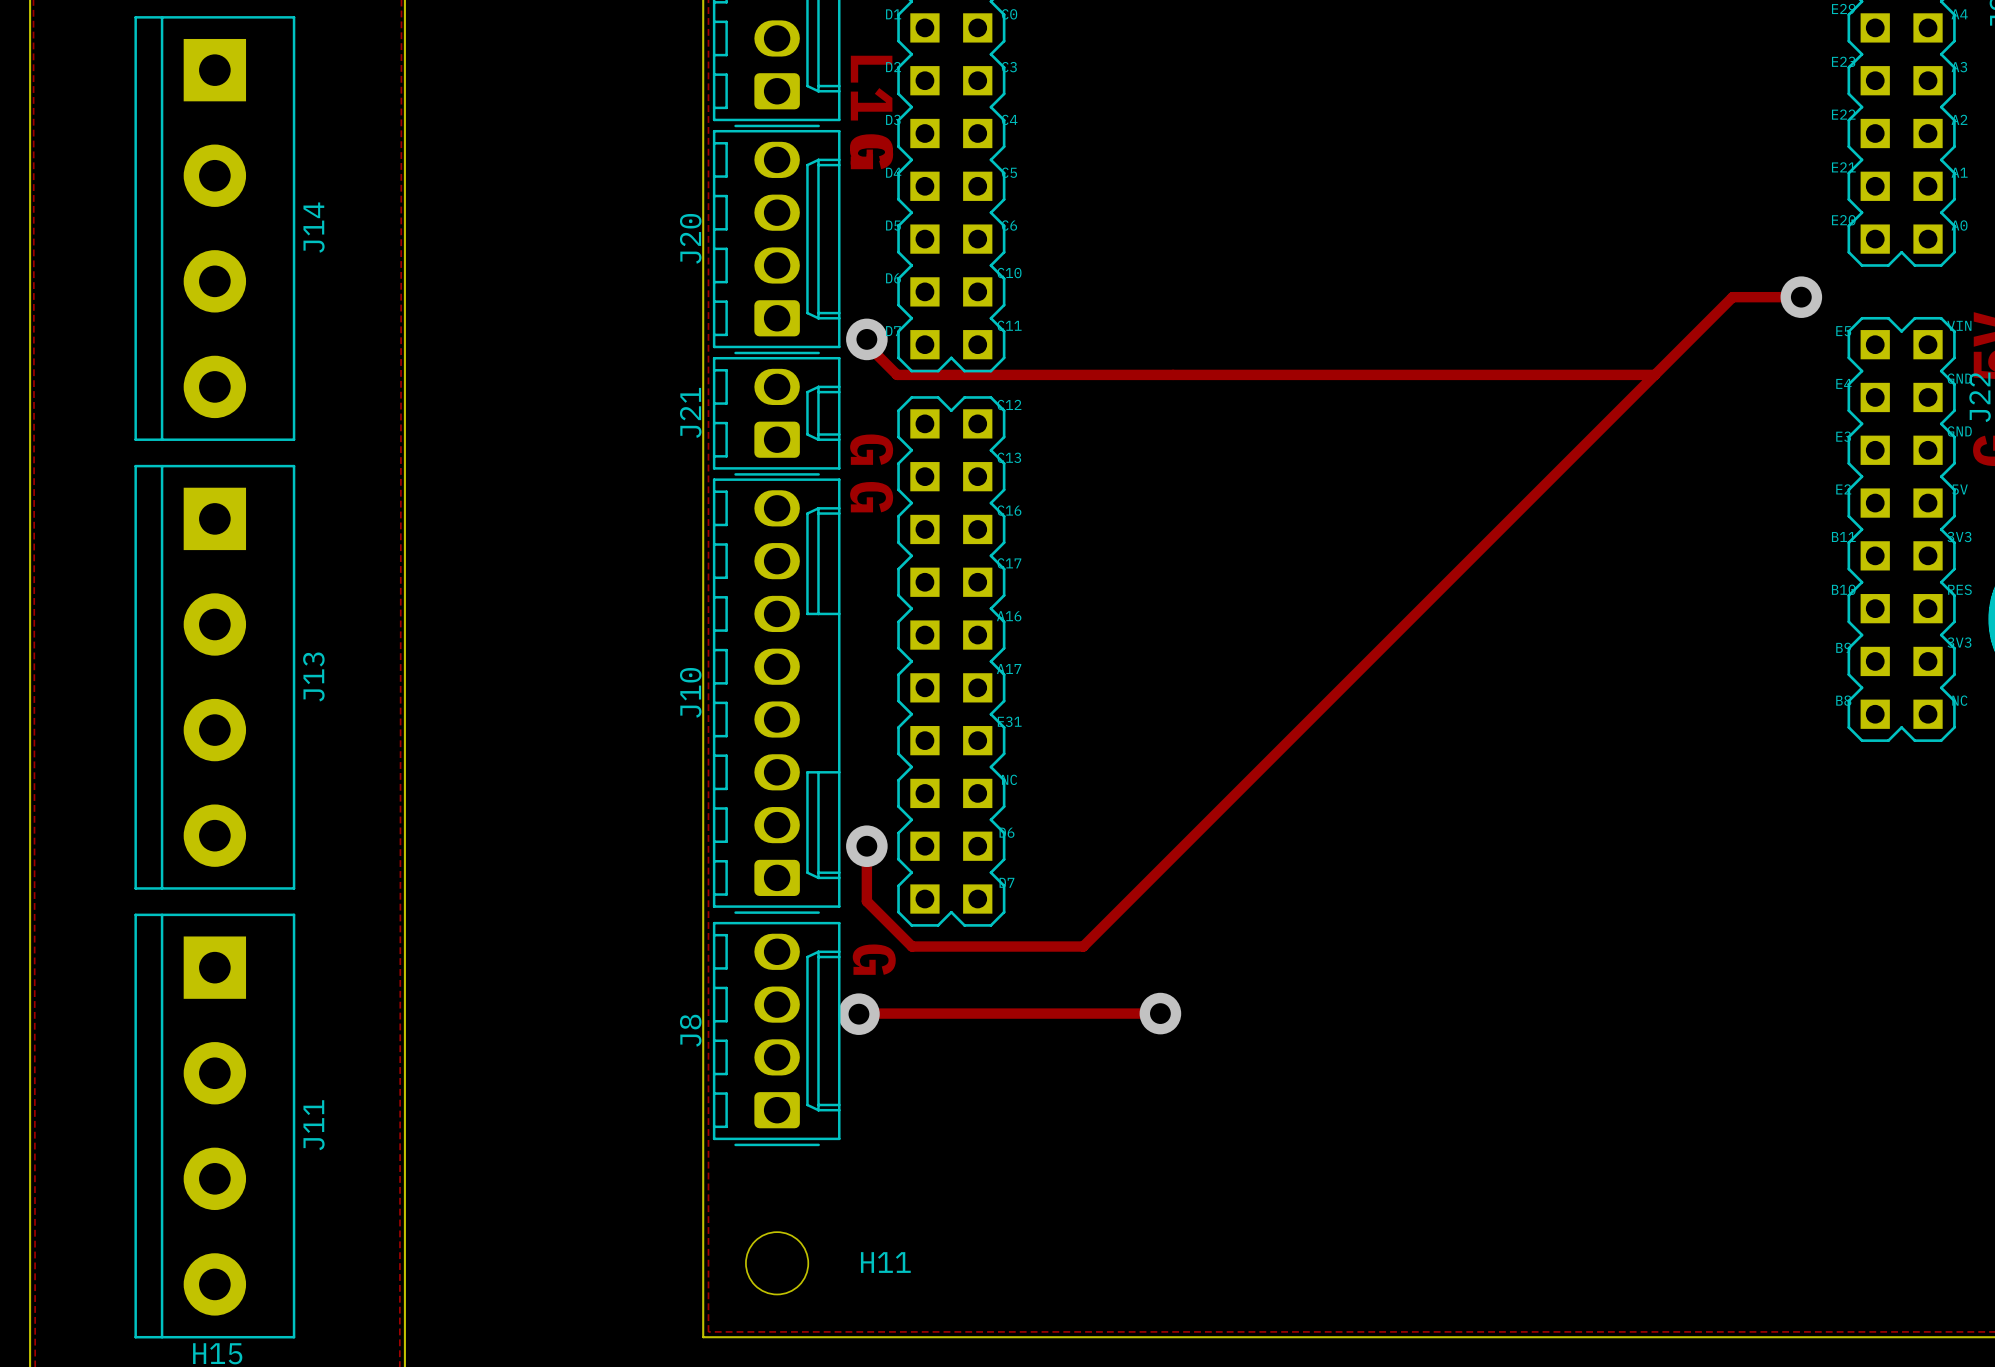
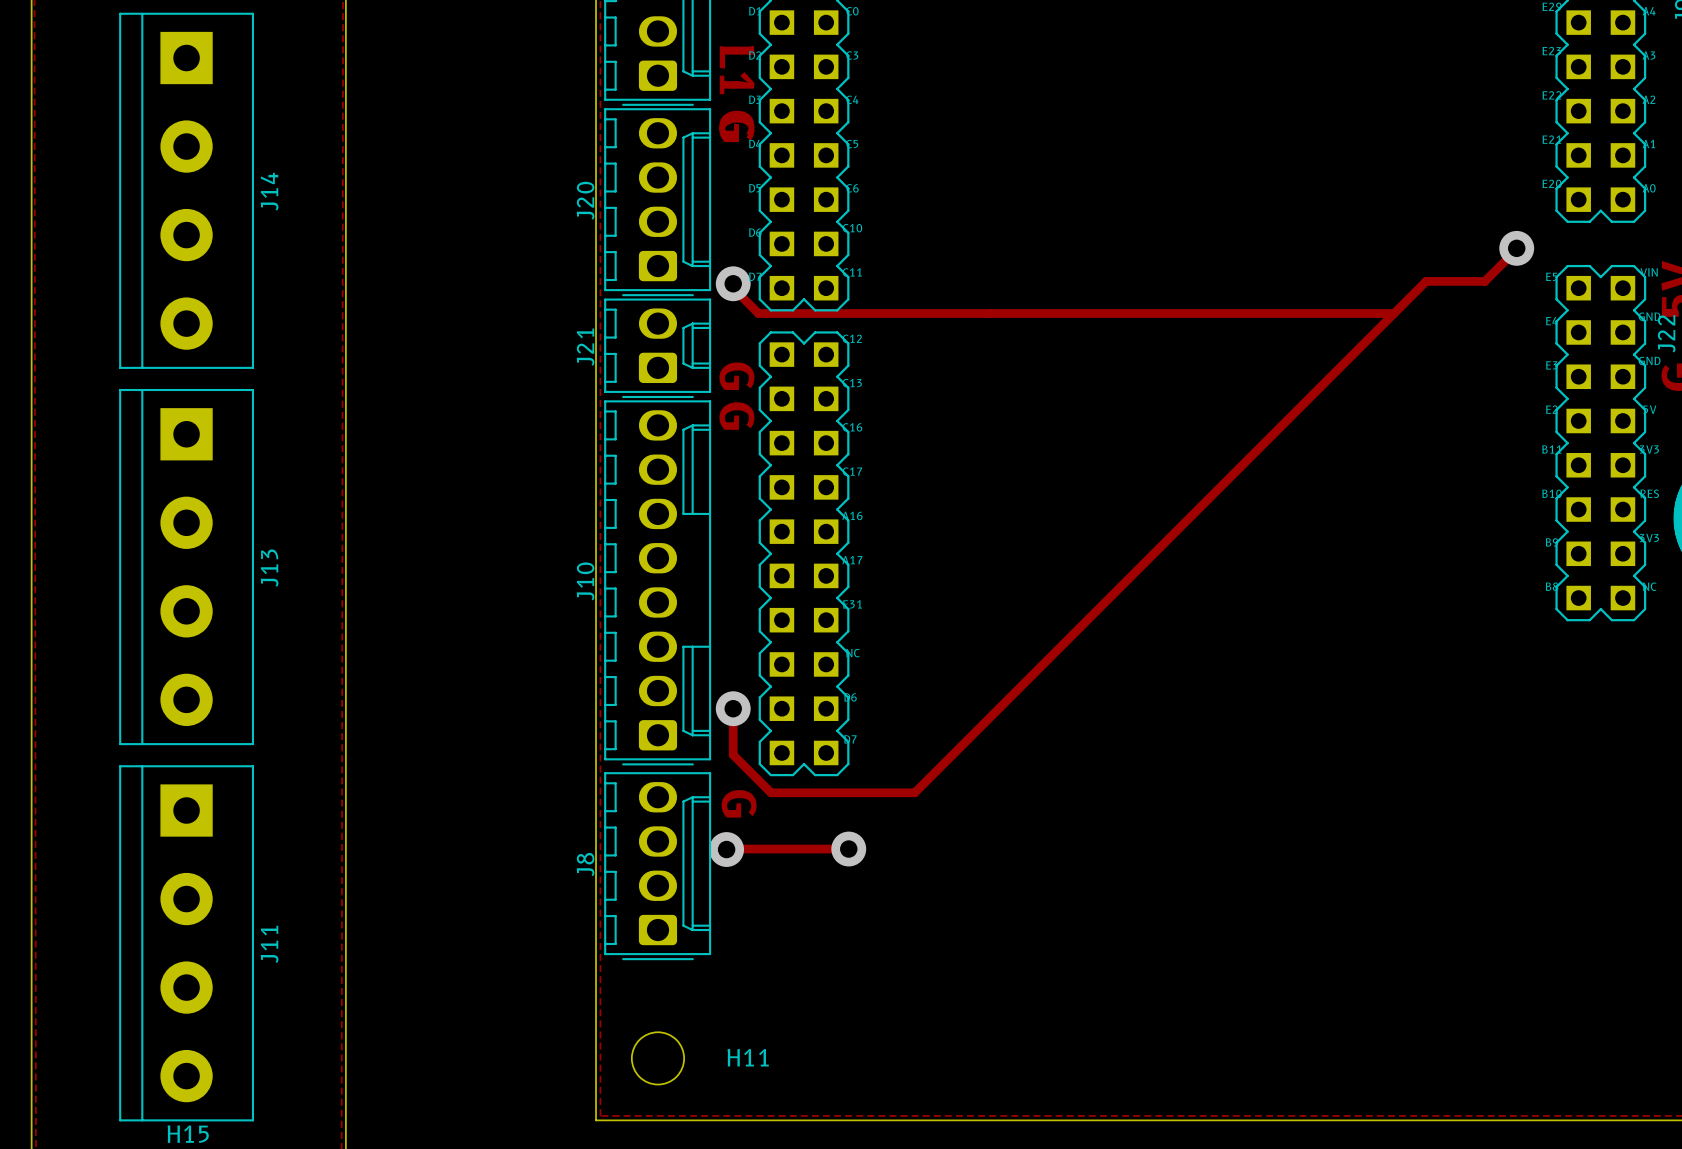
track: (1802, 297) (1732, 297) (1693, 336) -> (1517, 249) (1484, 281) (1426, 281)
track: (1004, 1013) (1160, 1013) -> none
via: none -> (848, 849)
via: (1160, 1013) -> none

